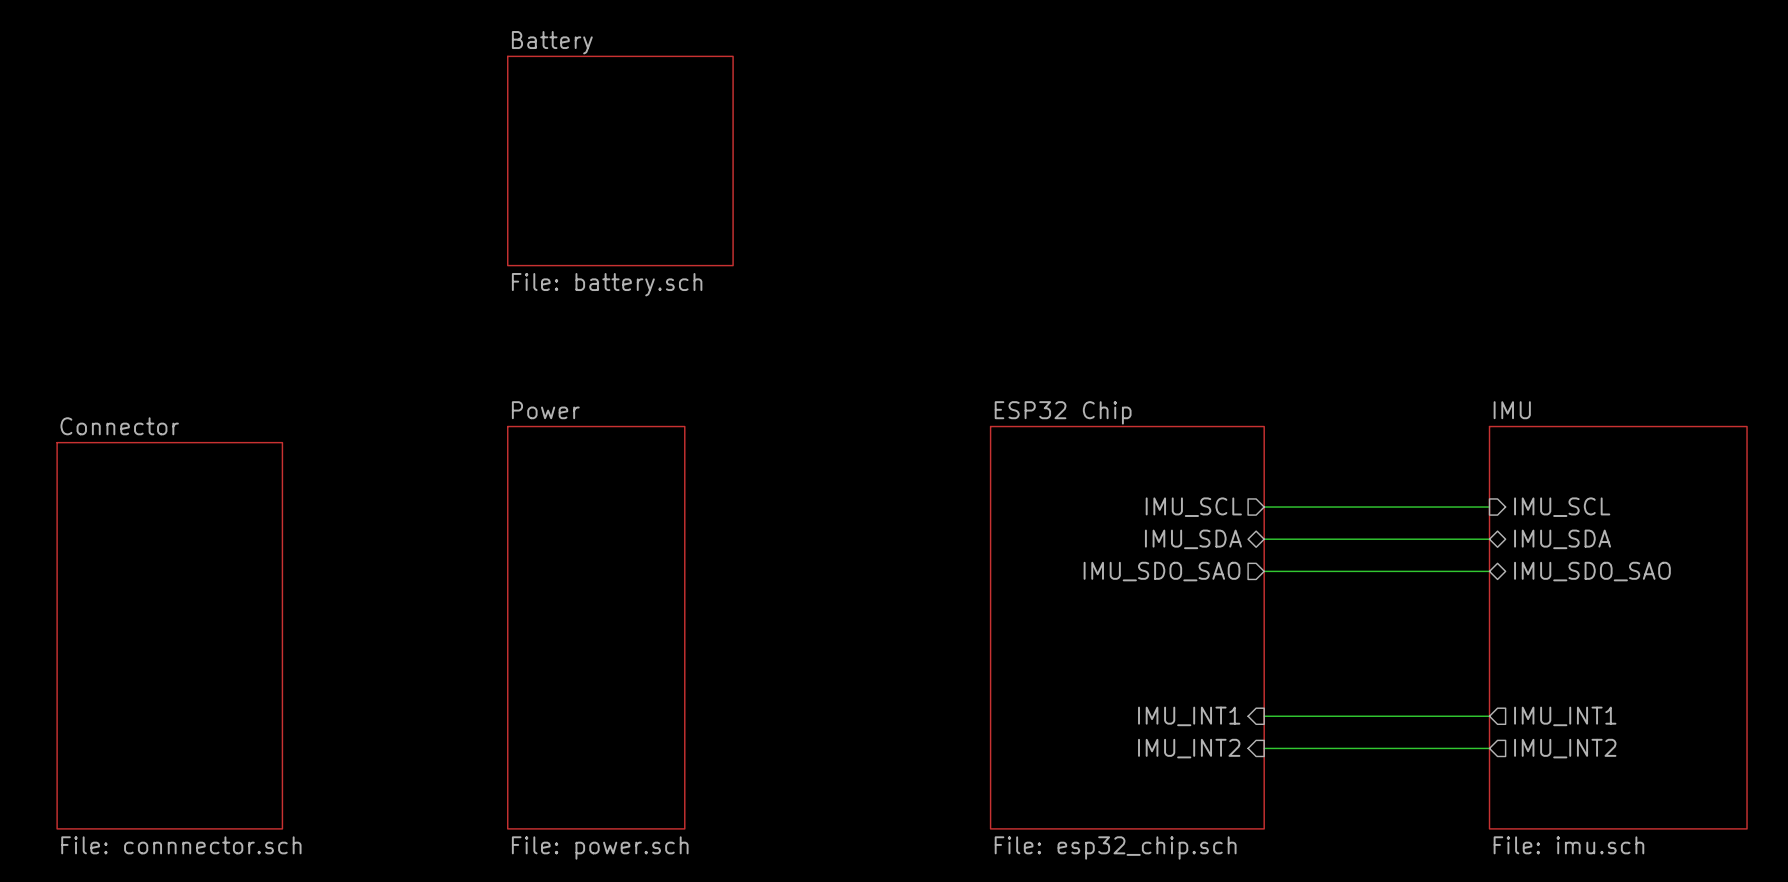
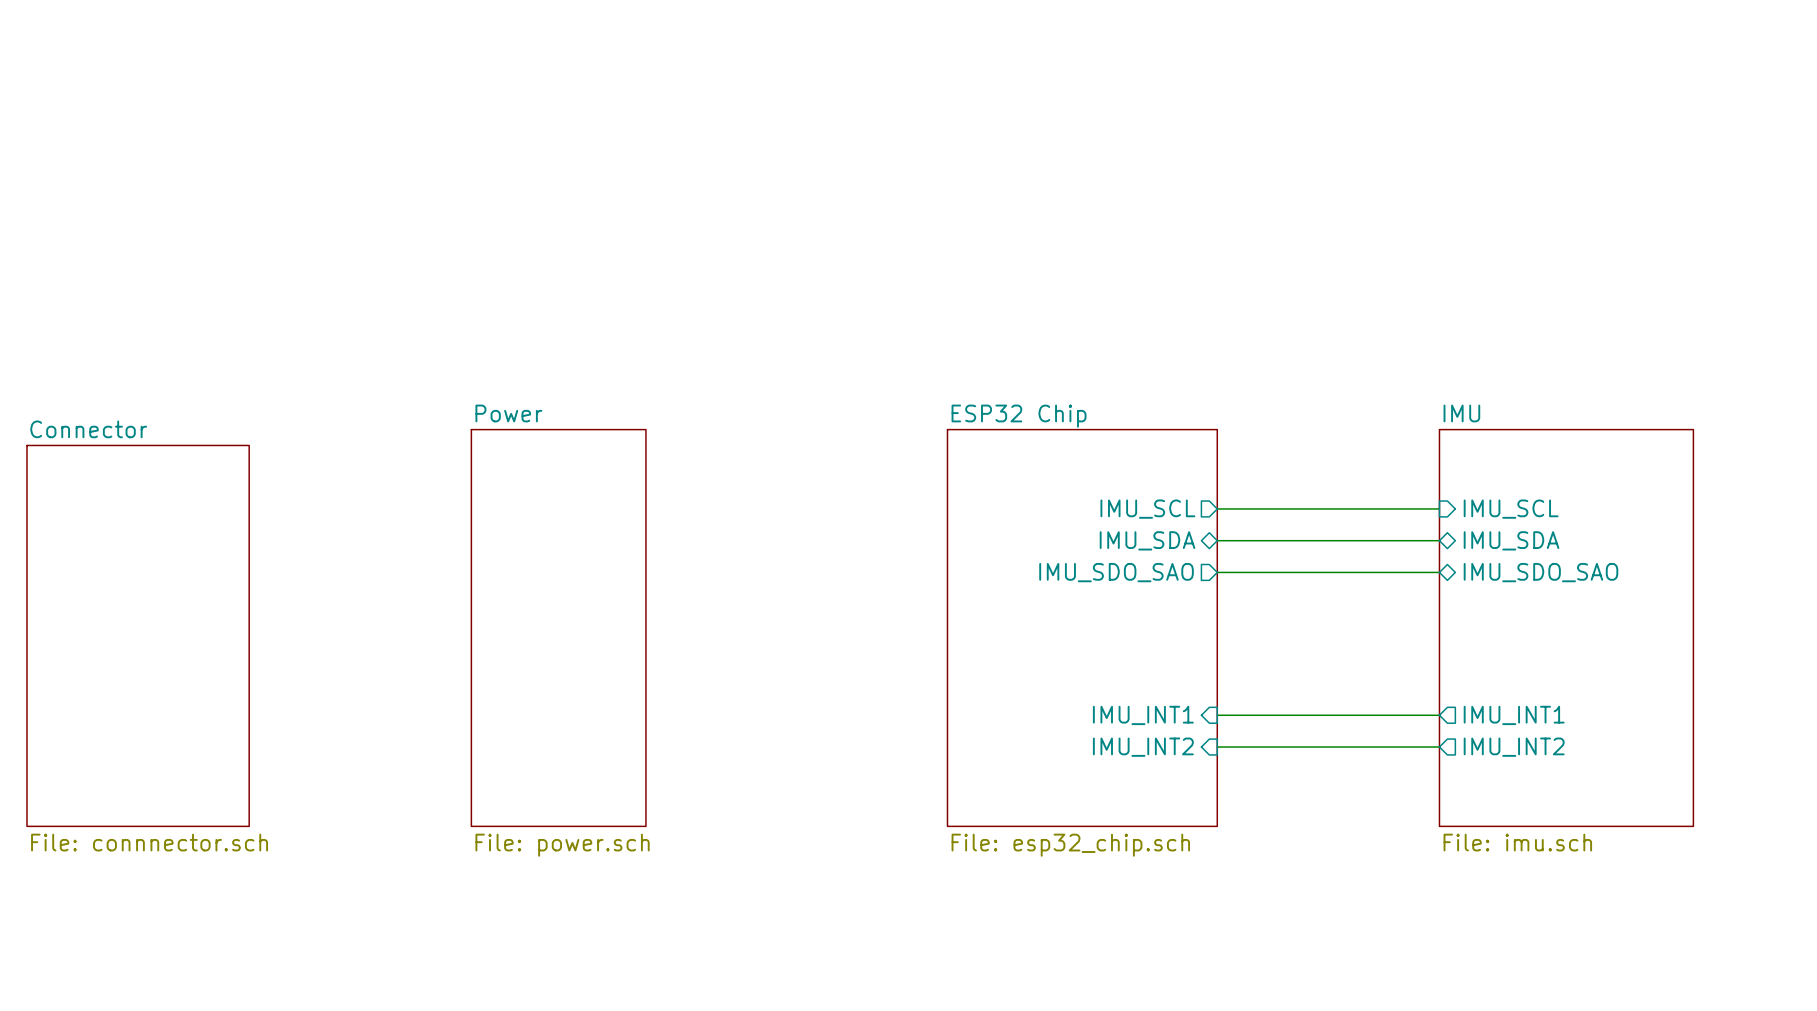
sheet Battery: File: battery.sch (620, 160) -> none

